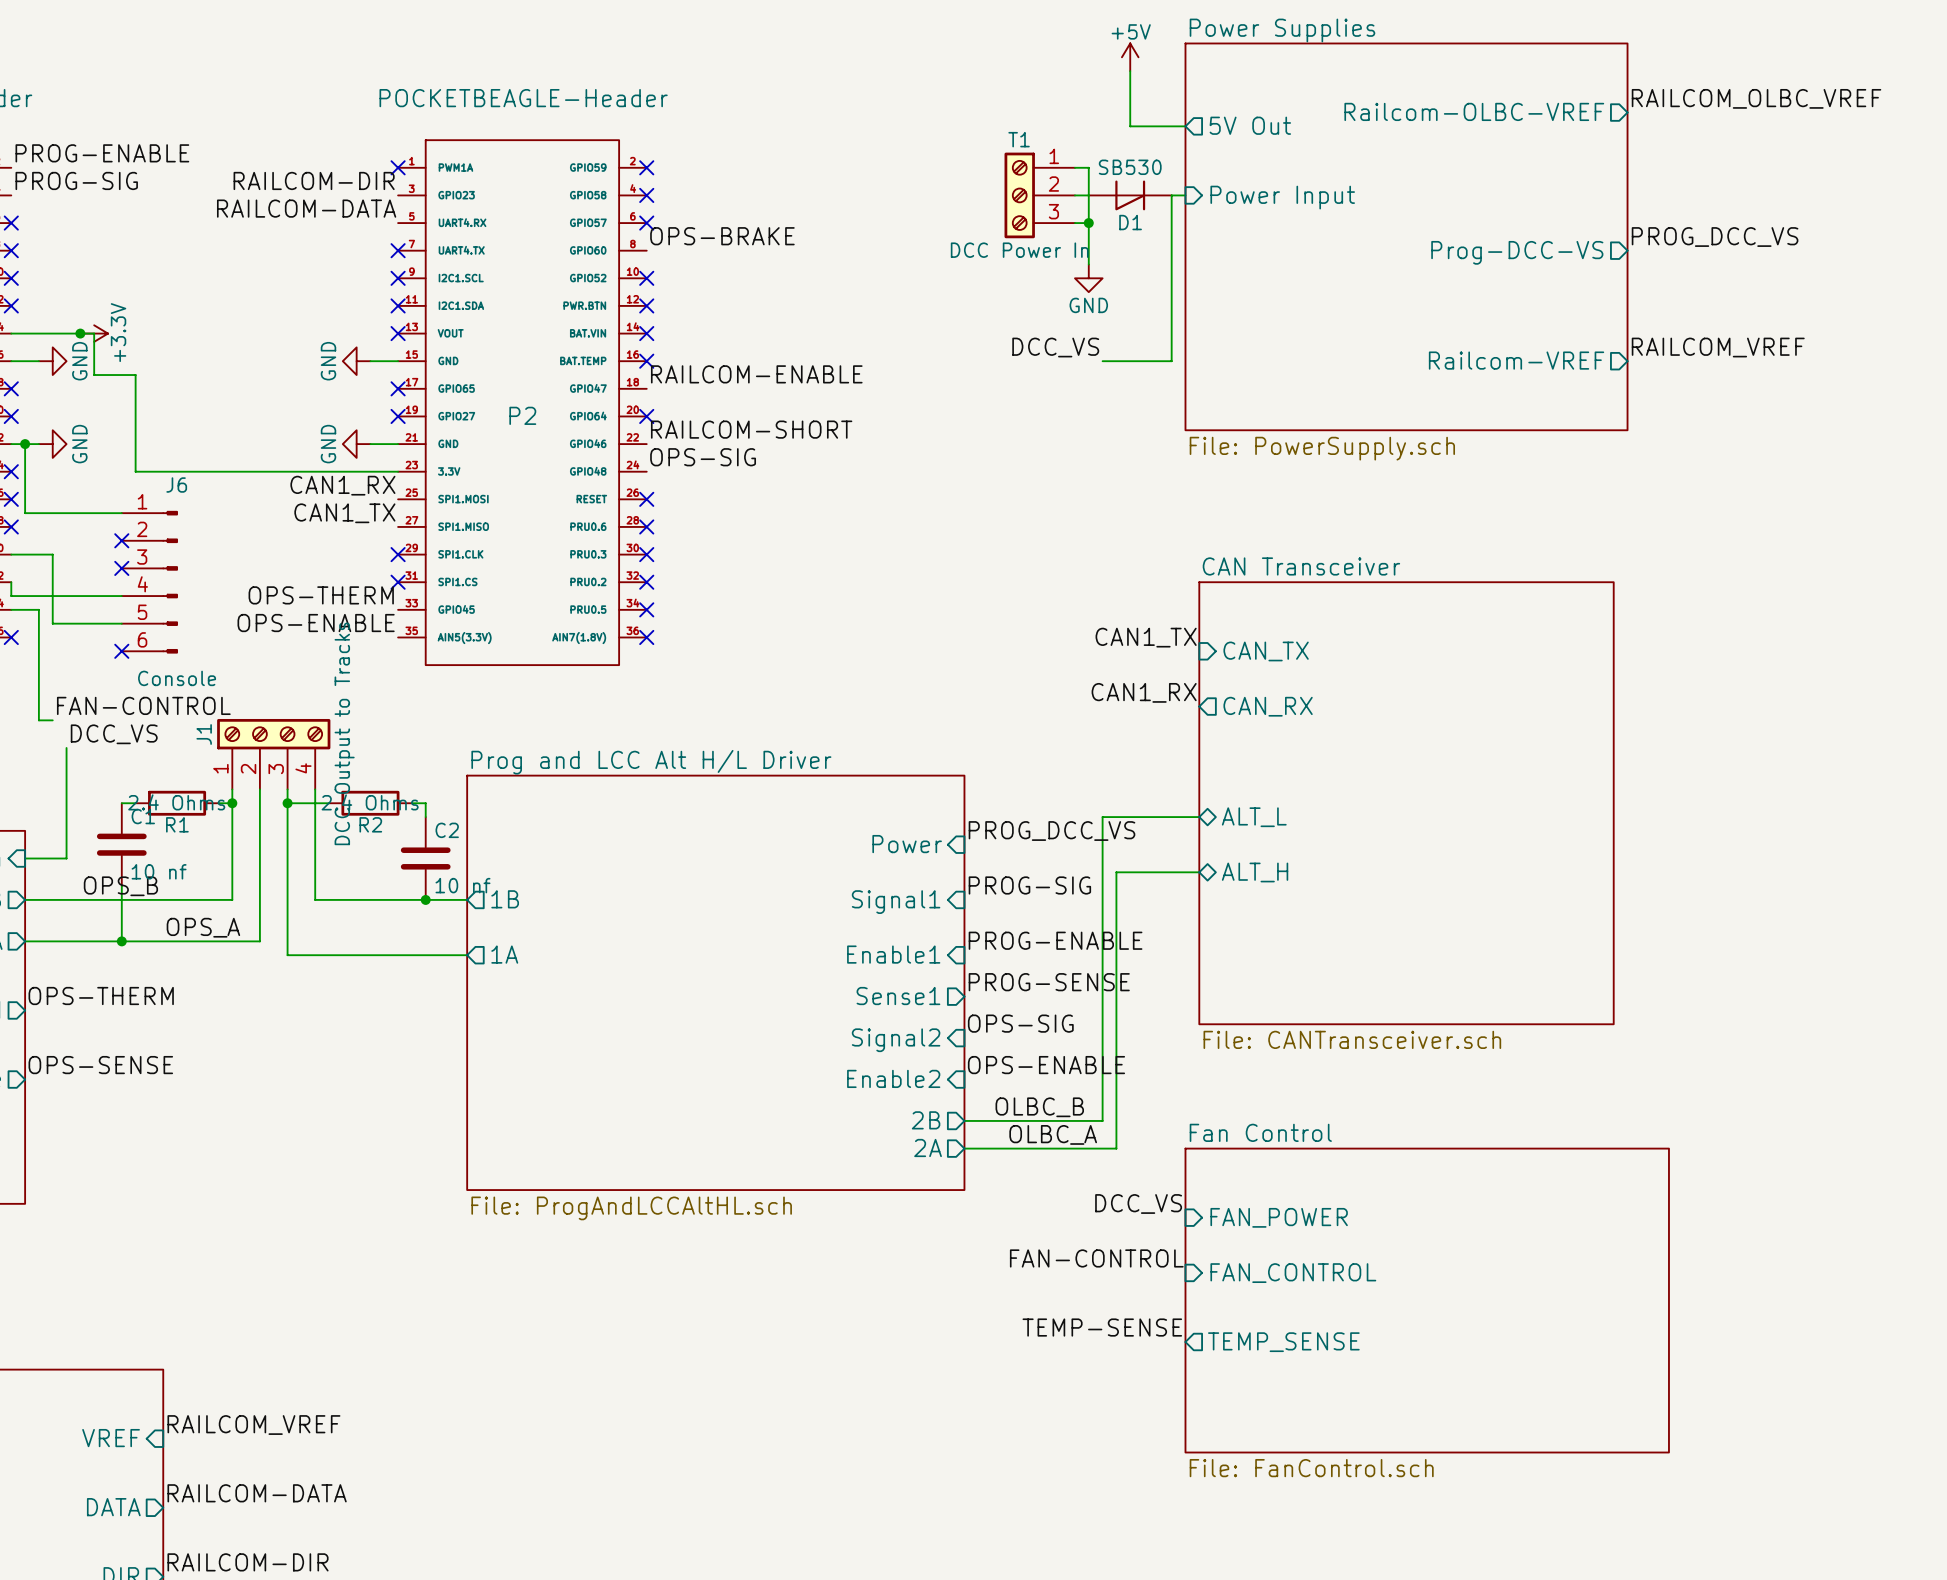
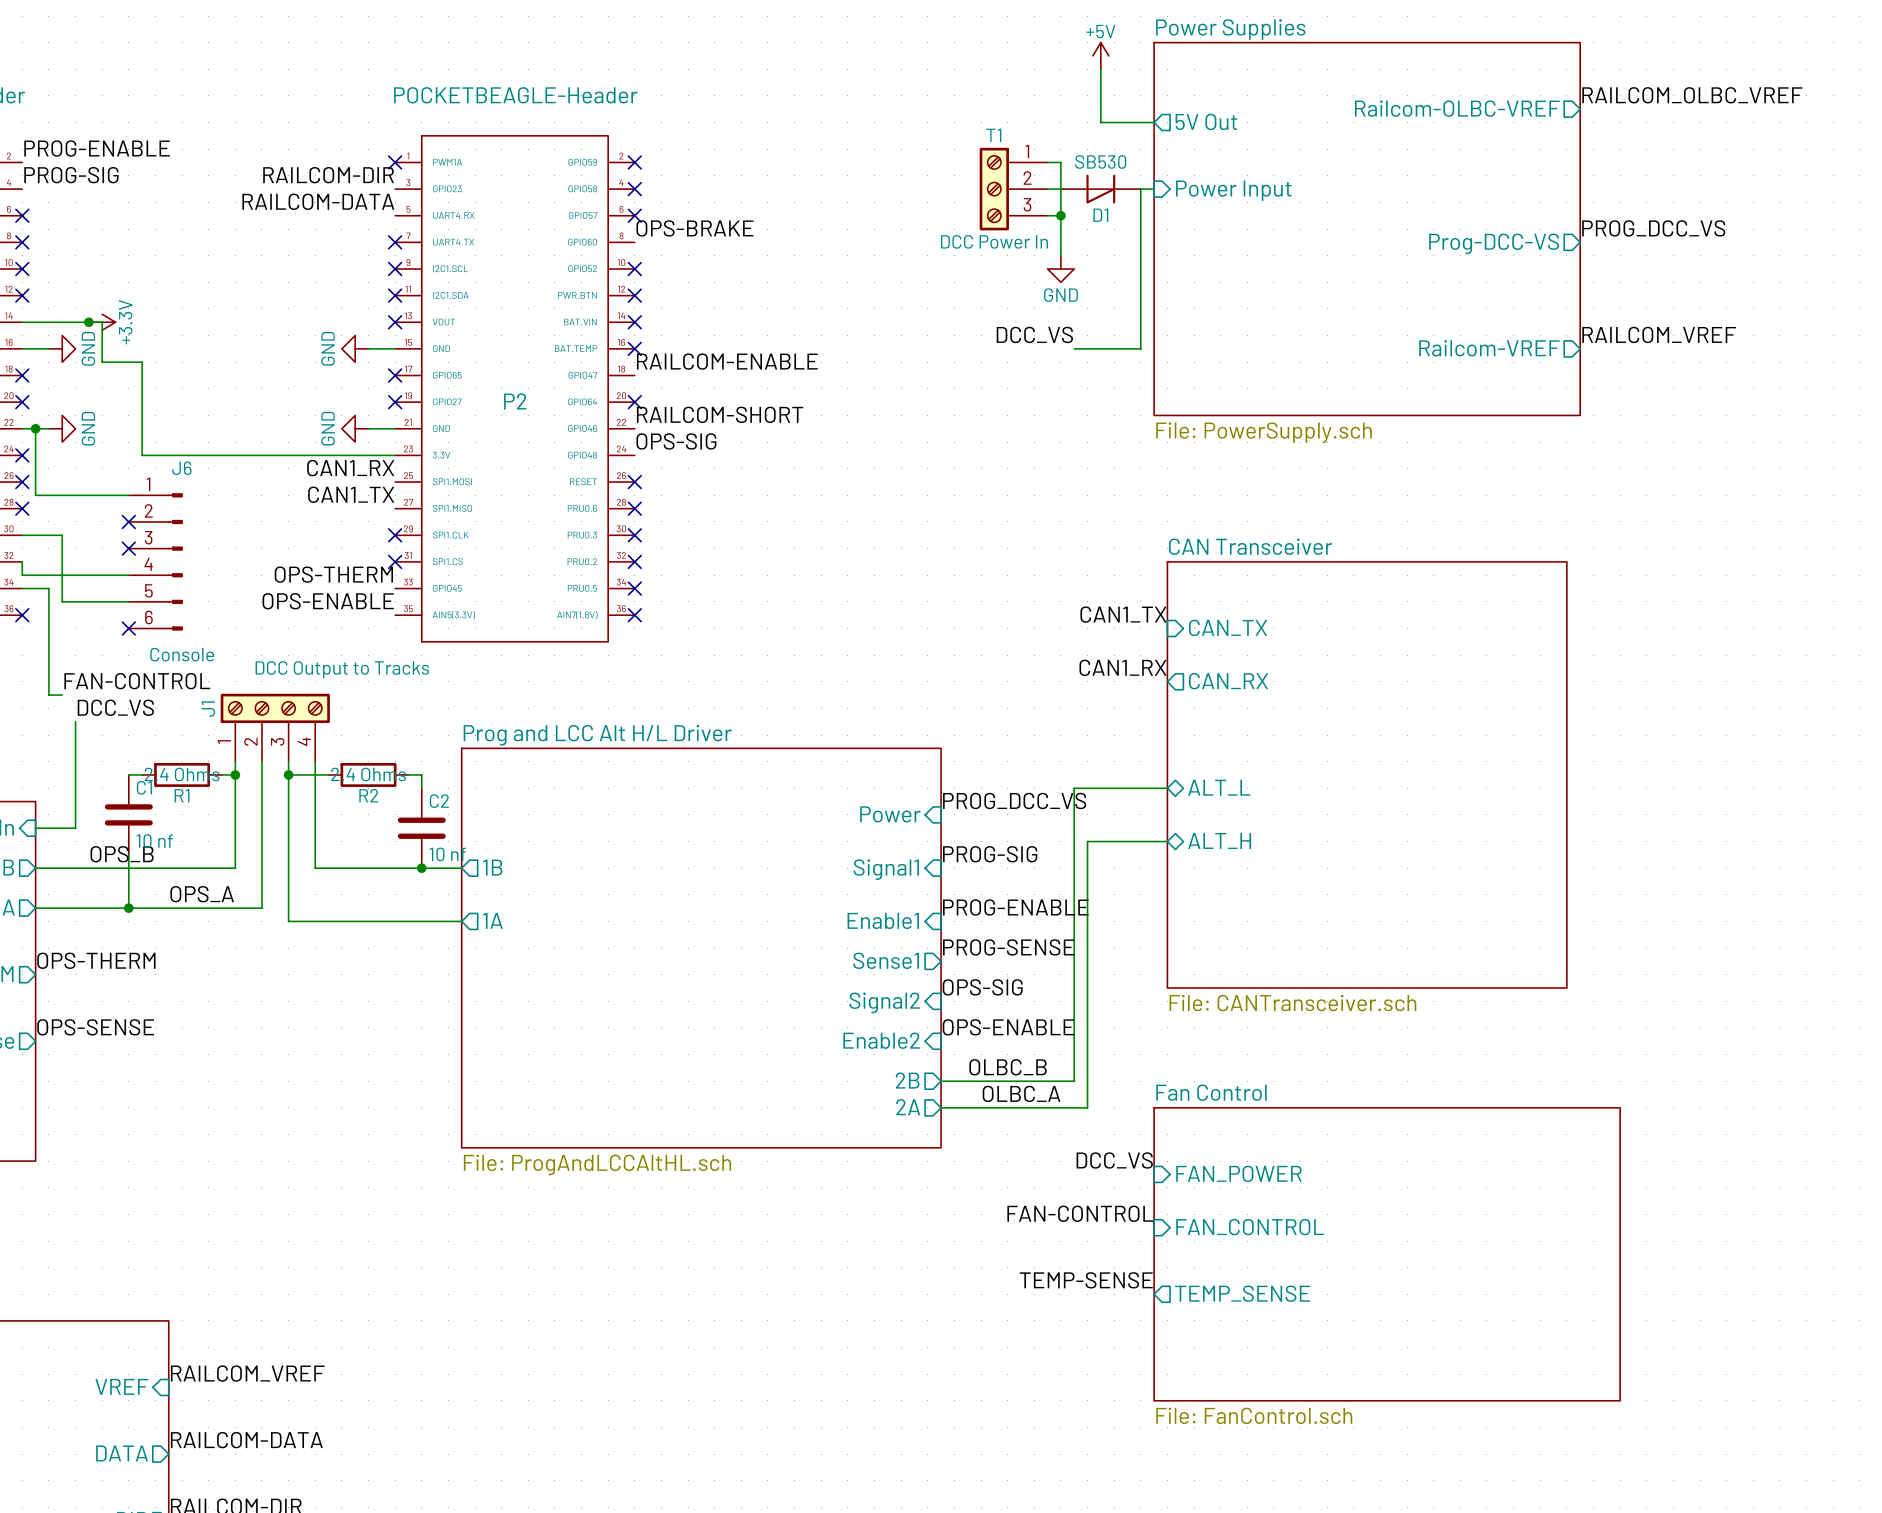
J1 value rotation: 0° (344, 733) -> 90° clockwise (342, 669)

